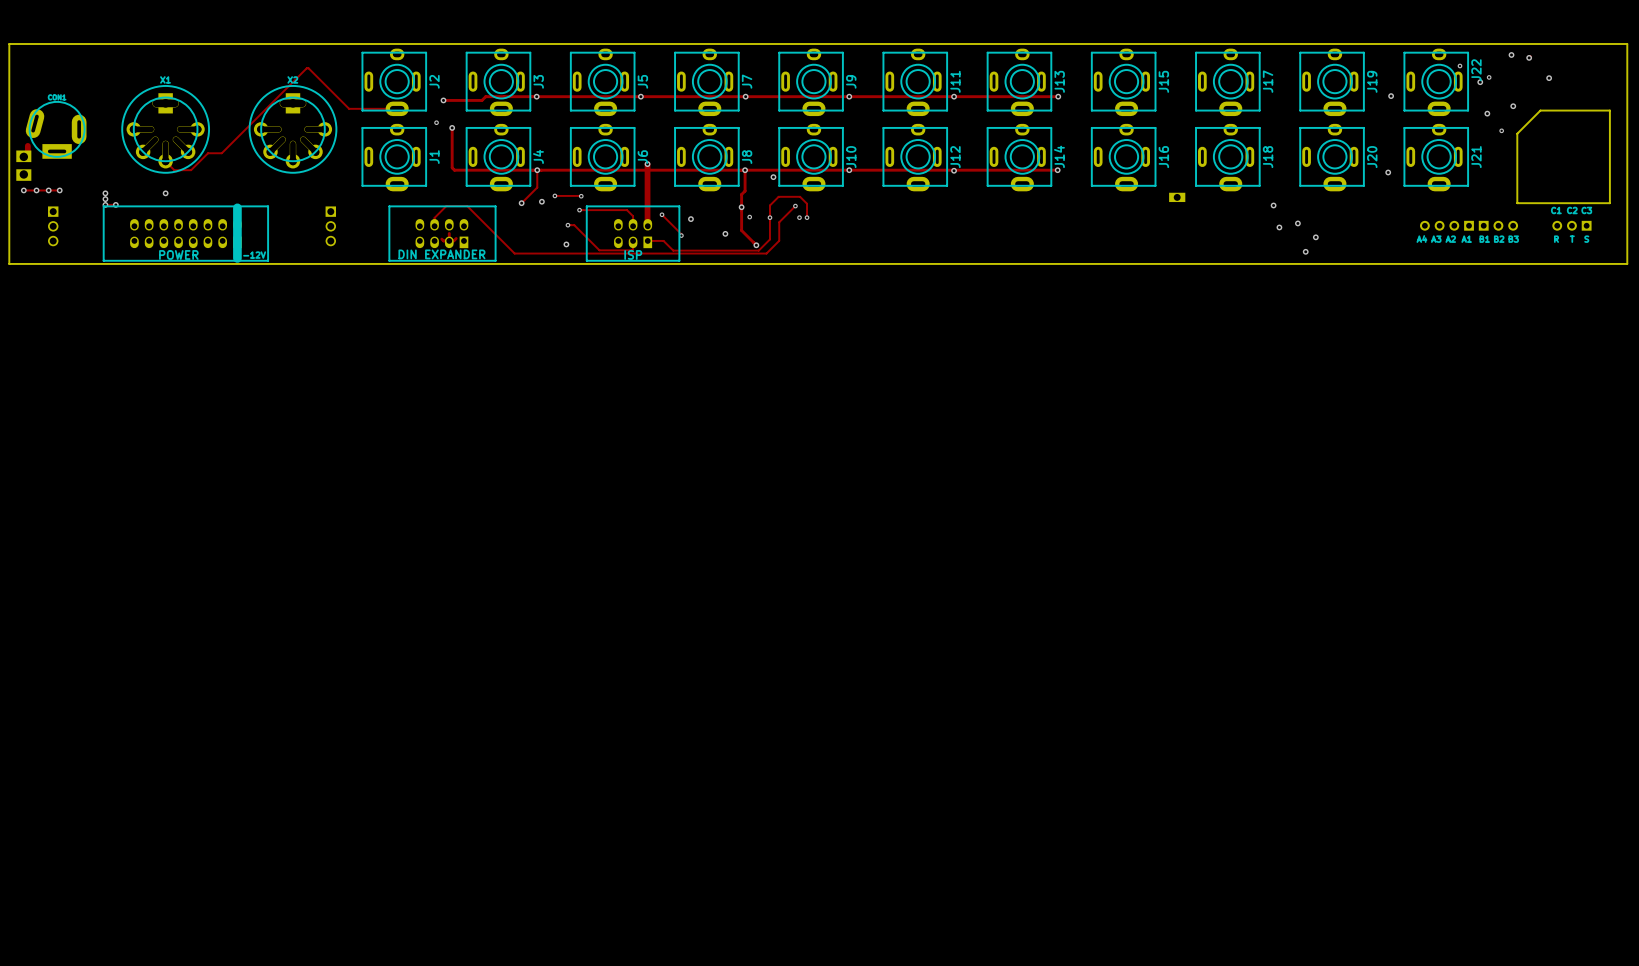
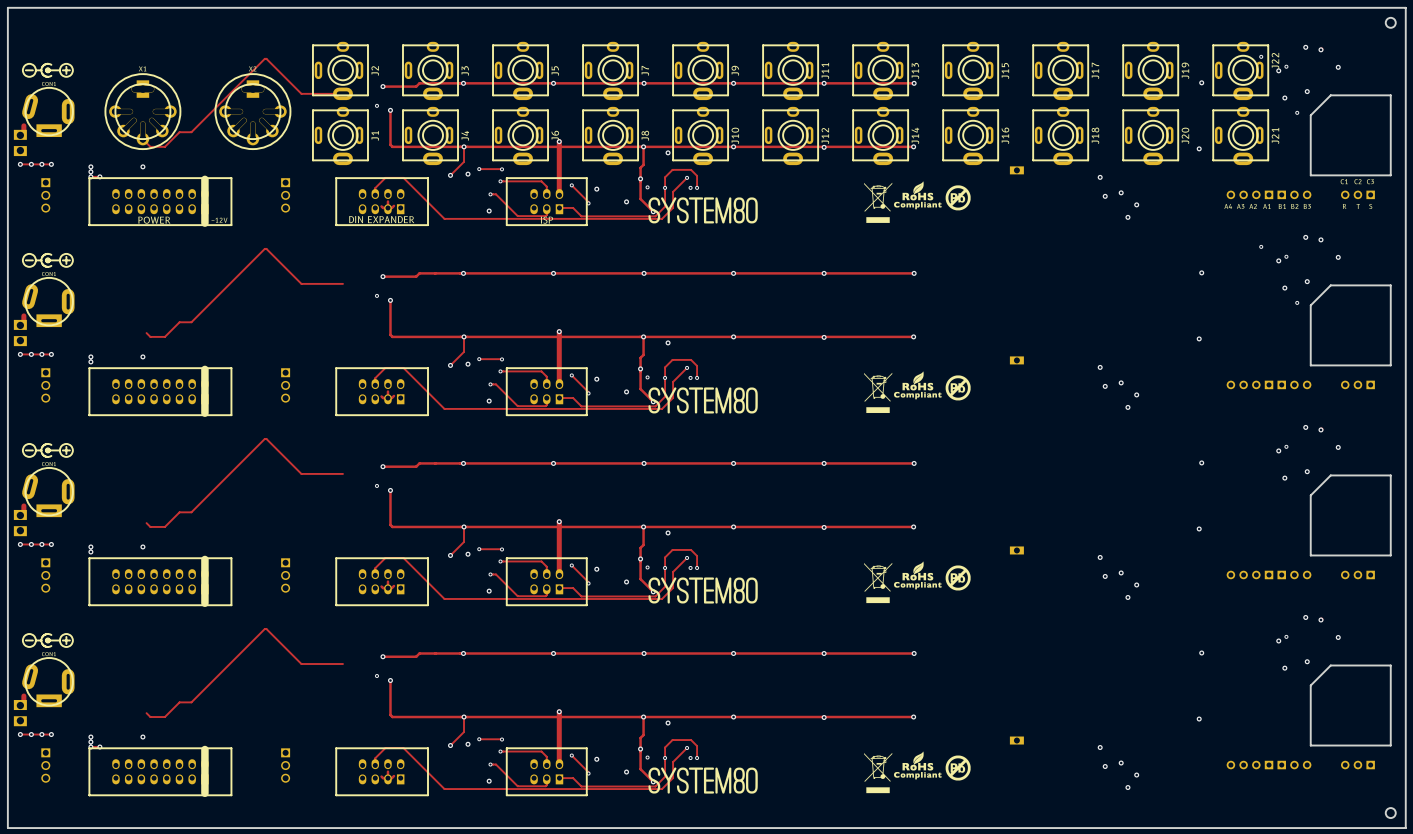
part: none -> (1390, 22)
board edge: (1627, 43) (9, 43) (9, 263) (1627, 263) -> (1405, 37) (1405, 7) (7, 7) (7, 828) (1405, 828) (1405, 227)
drawing: none -> [22, 63, 74, 78]
drawing: none -> [864, 181, 971, 223]
drawing: none -> [648, 197, 758, 224]
via: none -> (1305, 237)
via: none -> (1320, 239)
via: none -> (1261, 246)
drawing: none -> [22, 253, 74, 268]
via: none -> (1286, 256)
via: none -> (1338, 257)
via: none -> (1278, 260)
via: none -> (463, 273)
via: none -> (553, 273)
via: none -> (644, 273)
via: none -> (733, 273)
via: none -> (824, 273)
track: none -> (914, 273) (419, 273) (416, 276) (382, 276)
via: none -> (914, 273)
via: none -> (1201, 272)
via: none -> (382, 276)
via: none -> (1307, 281)
track: none -> (342, 283) (301, 283) (264, 248) (191, 322) (179, 322) (164, 336) (150, 336) (146, 333)
board edge: none -> (1330, 285) (1390, 285) (1390, 365) (1310, 365) (1310, 305) (1330, 285)
via: none -> (1284, 288)
via: none -> (376, 295)
track: none -> (390, 300) (390, 334) (392, 336) (913, 336)
via: none -> (390, 300)
part: none -> (48, 302)
via: none -> (1297, 302)
track: none -> (23, 315) (23, 325)
track: none -> (559, 331) (559, 385)
via: none -> (559, 331)
part: none -> (20, 333)
track: none -> (464, 336) (464, 351) (450, 365)
via: none -> (464, 336)
track: none -> (643, 336) (643, 354) (640, 357) (640, 389) (653, 401)
via: none -> (643, 336)
via: none -> (733, 336)
via: none -> (824, 337)
via: none -> (913, 336)
via: none -> (1199, 338)
via: none -> (668, 342)
track: none -> (20, 354) (51, 354)
via: none -> (20, 354)
via: none -> (31, 354)
via: none -> (41, 354)
via: none -> (51, 354)
via: none -> (90, 356)
via: none -> (142, 356)
track: none -> (479, 359) (502, 359)
via: none -> (479, 359)
via: none -> (502, 359)
part: none -> (1016, 360)
via: none -> (90, 361)
via: none -> (468, 364)
via: none -> (450, 365)
via: none -> (1100, 367)
line: none -> (336, 368) (336, 415) (427, 415) (427, 368) (336, 368)
line: none -> (506, 368) (506, 415) (586, 415) (586, 368) (506, 368)
track: none -> (687, 367) (673, 381) (673, 397) (662, 408) (444, 408) (403, 367) (385, 367) (375, 378) (375, 385)
via: none -> (687, 367)
line: none -> (204, 369) (204, 413)
via: none -> (640, 368)
drawing: none -> [864, 371, 971, 414]
track: none -> (500, 371) (541, 371) (546, 376) (546, 385)
via: none -> (500, 371)
track: none -> (571, 375) (588, 393)
via: none -> (571, 375)
via: none -> (647, 377)
via: none -> (665, 377)
via: none -> (690, 377)
track: none -> (697, 377) (697, 365) (691, 359) (672, 359) (665, 367) (665, 396) (655, 406) (581, 406) (573, 398) (559, 398)
via: none -> (697, 377)
via: none -> (596, 379)
via: none -> (1121, 382)
track: none -> (490, 384) (496, 384) (517, 406) (545, 406) (546, 398)
via: none -> (490, 384)
part: none -> (1249, 384)
part: none -> (1294, 384)
part: none -> (1357, 384)
part: none -> (45, 385)
part: none -> (285, 385)
via: none -> (1105, 386)
drawing: none -> [648, 387, 758, 414]
part: none -> (160, 391)
part: none -> (381, 391)
track: none -> (387, 391) (387, 398)
part: none -> (546, 391)
via: none -> (626, 391)
via: none -> (588, 393)
via: none -> (1136, 394)
track: none -> (393, 395) (391, 398) (381, 396)
via: none -> (489, 401)
via: none -> (653, 401)
via: none -> (1127, 407)
line: none -> (89, 415) (89, 368) (231, 368) (231, 415) (89, 415)
via: none -> (1305, 427)
via: none -> (1320, 429)
drawing: none -> [22, 443, 74, 458]
via: none -> (1286, 446)
via: none -> (1338, 447)
via: none -> (1278, 450)
via: none -> (463, 463)
via: none -> (553, 463)
via: none -> (644, 463)
via: none -> (733, 463)
via: none -> (824, 463)
track: none -> (914, 463) (419, 463) (416, 466) (382, 466)
via: none -> (914, 463)
via: none -> (1201, 462)
via: none -> (382, 466)
via: none -> (1307, 471)
track: none -> (342, 473) (301, 473) (264, 438) (191, 512) (179, 512) (164, 526) (150, 526) (146, 523)
board edge: none -> (1330, 475) (1310, 495) (1310, 555) (1390, 555) (1390, 475) (1330, 475)
via: none -> (1284, 478)
via: none -> (376, 485)
track: none -> (390, 490) (390, 524) (392, 526) (913, 526)
via: none -> (390, 490)
part: none -> (48, 492)
track: none -> (23, 505) (23, 515)
track: none -> (559, 521) (559, 575)
via: none -> (559, 521)
part: none -> (20, 523)
track: none -> (464, 526) (464, 541) (450, 555)
via: none -> (464, 526)
track: none -> (643, 526) (643, 544) (640, 547) (640, 579) (653, 591)
via: none -> (643, 526)
via: none -> (733, 526)
via: none -> (824, 527)
via: none -> (913, 526)
via: none -> (1199, 528)
via: none -> (668, 532)
track: none -> (20, 544) (51, 544)
via: none -> (20, 544)
via: none -> (31, 544)
via: none -> (41, 544)
via: none -> (51, 544)
via: none -> (90, 546)
via: none -> (142, 546)
track: none -> (479, 549) (502, 549)
via: none -> (479, 549)
via: none -> (502, 549)
part: none -> (1016, 550)
via: none -> (90, 551)
via: none -> (468, 554)
via: none -> (450, 555)
via: none -> (1100, 557)
line: none -> (336, 558) (427, 558) (427, 605) (336, 605) (336, 558)
line: none -> (506, 558) (586, 558) (586, 605) (506, 605) (506, 558)
track: none -> (687, 557) (673, 571) (673, 587) (662, 598) (444, 598) (403, 557) (385, 557) (375, 568) (375, 575)
via: none -> (687, 557)
line: none -> (204, 559) (204, 603)
via: none -> (640, 558)
drawing: none -> [864, 561, 971, 604]
track: none -> (500, 561) (541, 561) (546, 566) (546, 575)
via: none -> (500, 561)
track: none -> (571, 565) (588, 583)
via: none -> (571, 565)
via: none -> (647, 567)
via: none -> (665, 567)
via: none -> (690, 567)
track: none -> (697, 567) (697, 555) (691, 549) (672, 549) (665, 557) (665, 586) (655, 596) (581, 596) (573, 588) (559, 588)
via: none -> (697, 567)
via: none -> (596, 569)
via: none -> (1121, 572)
track: none -> (490, 574) (496, 574) (517, 596) (545, 596) (546, 588)
via: none -> (490, 574)
part: none -> (1249, 574)
part: none -> (1294, 574)
part: none -> (1357, 574)
part: none -> (45, 575)
part: none -> (285, 575)
via: none -> (1105, 576)
drawing: none -> [648, 577, 758, 604]
part: none -> (160, 581)
part: none -> (381, 581)
track: none -> (387, 581) (387, 588)
part: none -> (546, 581)
via: none -> (626, 581)
via: none -> (588, 583)
via: none -> (1136, 584)
track: none -> (393, 585) (391, 588) (381, 586)
via: none -> (489, 591)
via: none -> (653, 591)
via: none -> (1127, 597)
line: none -> (89, 605) (89, 558) (231, 558) (231, 605) (89, 605)
via: none -> (1305, 617)
via: none -> (1320, 619)
drawing: none -> [22, 633, 74, 648]
via: none -> (1286, 636)
via: none -> (1338, 637)
via: none -> (1278, 640)
via: none -> (463, 653)
via: none -> (553, 653)
via: none -> (644, 653)
via: none -> (733, 653)
via: none -> (824, 653)
track: none -> (914, 653) (419, 653) (416, 656) (382, 656)
via: none -> (914, 653)
via: none -> (1201, 653)
via: none -> (382, 656)
via: none -> (1307, 661)
track: none -> (342, 664) (301, 664) (264, 628) (191, 702) (179, 702) (164, 717) (150, 717) (146, 713)
board edge: none -> (1330, 665) (1310, 685) (1310, 745) (1390, 745) (1390, 665) (1330, 665)
via: none -> (1284, 668)
via: none -> (376, 676)
track: none -> (390, 680) (390, 715) (392, 717) (913, 717)
via: none -> (390, 680)
part: none -> (48, 682)
track: none -> (23, 696) (23, 705)
track: none -> (559, 711) (559, 765)
via: none -> (559, 711)
part: none -> (20, 713)
track: none -> (464, 717) (464, 732) (450, 745)
via: none -> (464, 717)
track: none -> (643, 717) (643, 735) (640, 738) (640, 769) (653, 781)
via: none -> (643, 717)
via: none -> (733, 717)
via: none -> (824, 717)
via: none -> (913, 717)
via: none -> (1199, 719)
via: none -> (668, 723)
track: none -> (20, 734) (51, 734)
via: none -> (20, 734)
via: none -> (31, 734)
via: none -> (41, 734)
via: none -> (51, 734)
via: none -> (90, 737)
via: none -> (142, 737)
track: none -> (479, 739) (502, 739)
via: none -> (479, 739)
via: none -> (502, 739)
part: none -> (1016, 740)
via: none -> (90, 742)
via: none -> (468, 744)
via: none -> (450, 745)
track: none -> (90, 747) (99, 747)
via: none -> (90, 747)
via: none -> (99, 747)
track: none -> (687, 748) (673, 762) (673, 778) (662, 789) (444, 789) (403, 748) (385, 748) (375, 758) (375, 765)
via: none -> (687, 748)
via: none -> (1100, 747)
line: none -> (336, 748) (336, 795) (427, 795) (427, 748) (336, 748)
line: none -> (506, 748) (586, 748) (586, 795) (506, 795) (506, 748)
line: none -> (204, 749) (204, 793)
via: none -> (640, 749)
drawing: none -> [864, 751, 971, 794]
track: none -> (500, 751) (541, 751) (546, 756) (546, 765)
via: none -> (500, 751)
track: none -> (571, 755) (588, 773)
via: none -> (571, 755)
via: none -> (647, 757)
via: none -> (665, 758)
via: none -> (690, 758)
track: none -> (697, 758) (697, 746) (691, 740) (672, 740) (665, 747) (665, 776) (655, 786) (581, 786) (573, 778) (559, 778)
via: none -> (697, 758)
via: none -> (596, 759)
via: none -> (1121, 763)
track: none -> (490, 764) (496, 764) (517, 786) (545, 786) (546, 778)
via: none -> (490, 764)
part: none -> (1249, 765)
part: none -> (1294, 765)
part: none -> (1357, 765)
part: none -> (45, 765)
part: none -> (285, 765)
via: none -> (1105, 766)
drawing: none -> [648, 767, 758, 794]
part: none -> (160, 771)
part: none -> (381, 771)
track: none -> (387, 771) (387, 778)
part: none -> (546, 771)
via: none -> (626, 772)
via: none -> (588, 773)
via: none -> (1136, 775)
track: none -> (393, 776) (391, 778) (381, 776)
via: none -> (489, 781)
via: none -> (653, 781)
via: none -> (1127, 787)
line: none -> (89, 795) (89, 748) (231, 748) (231, 795) (89, 795)
part: none -> (1390, 813)

